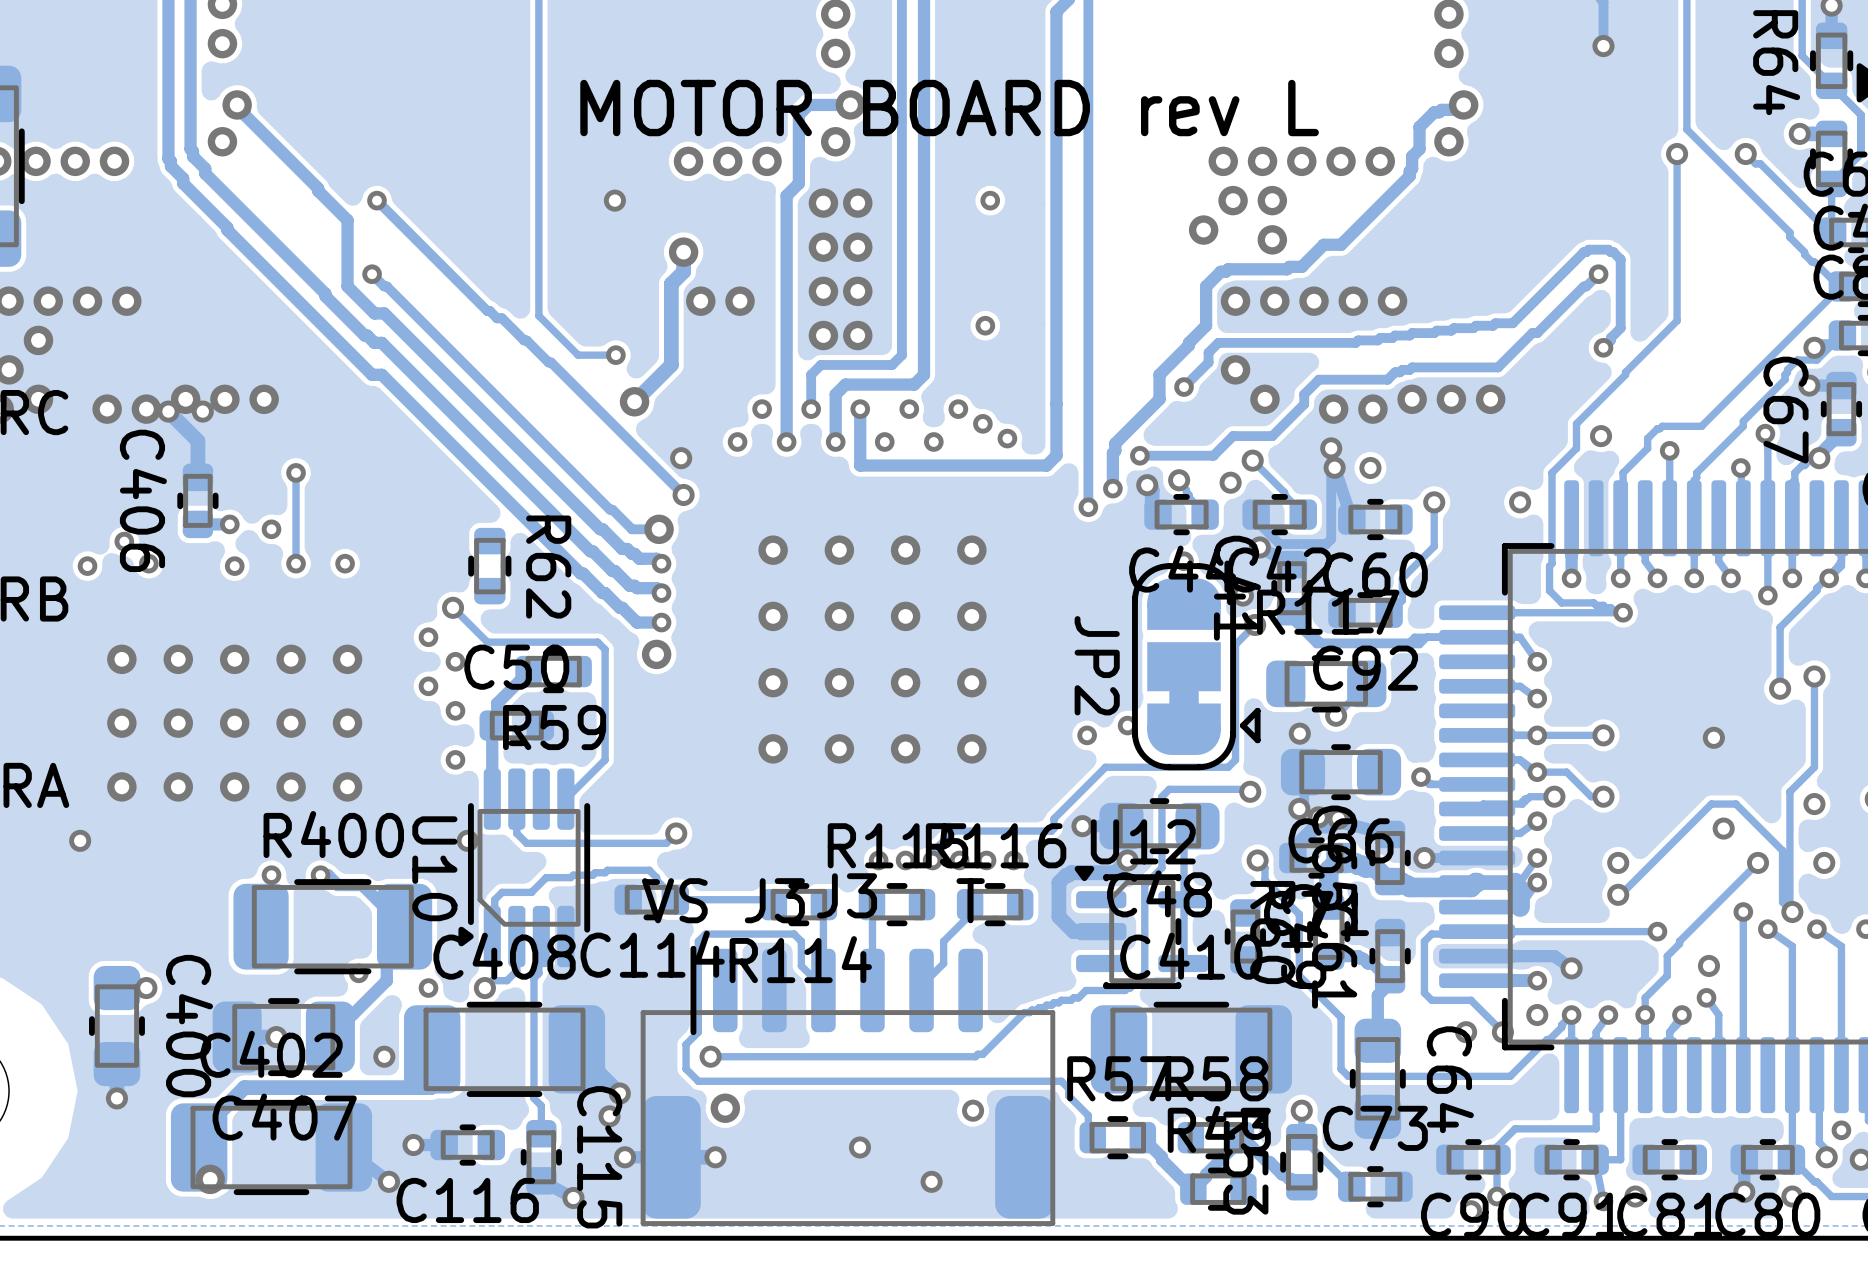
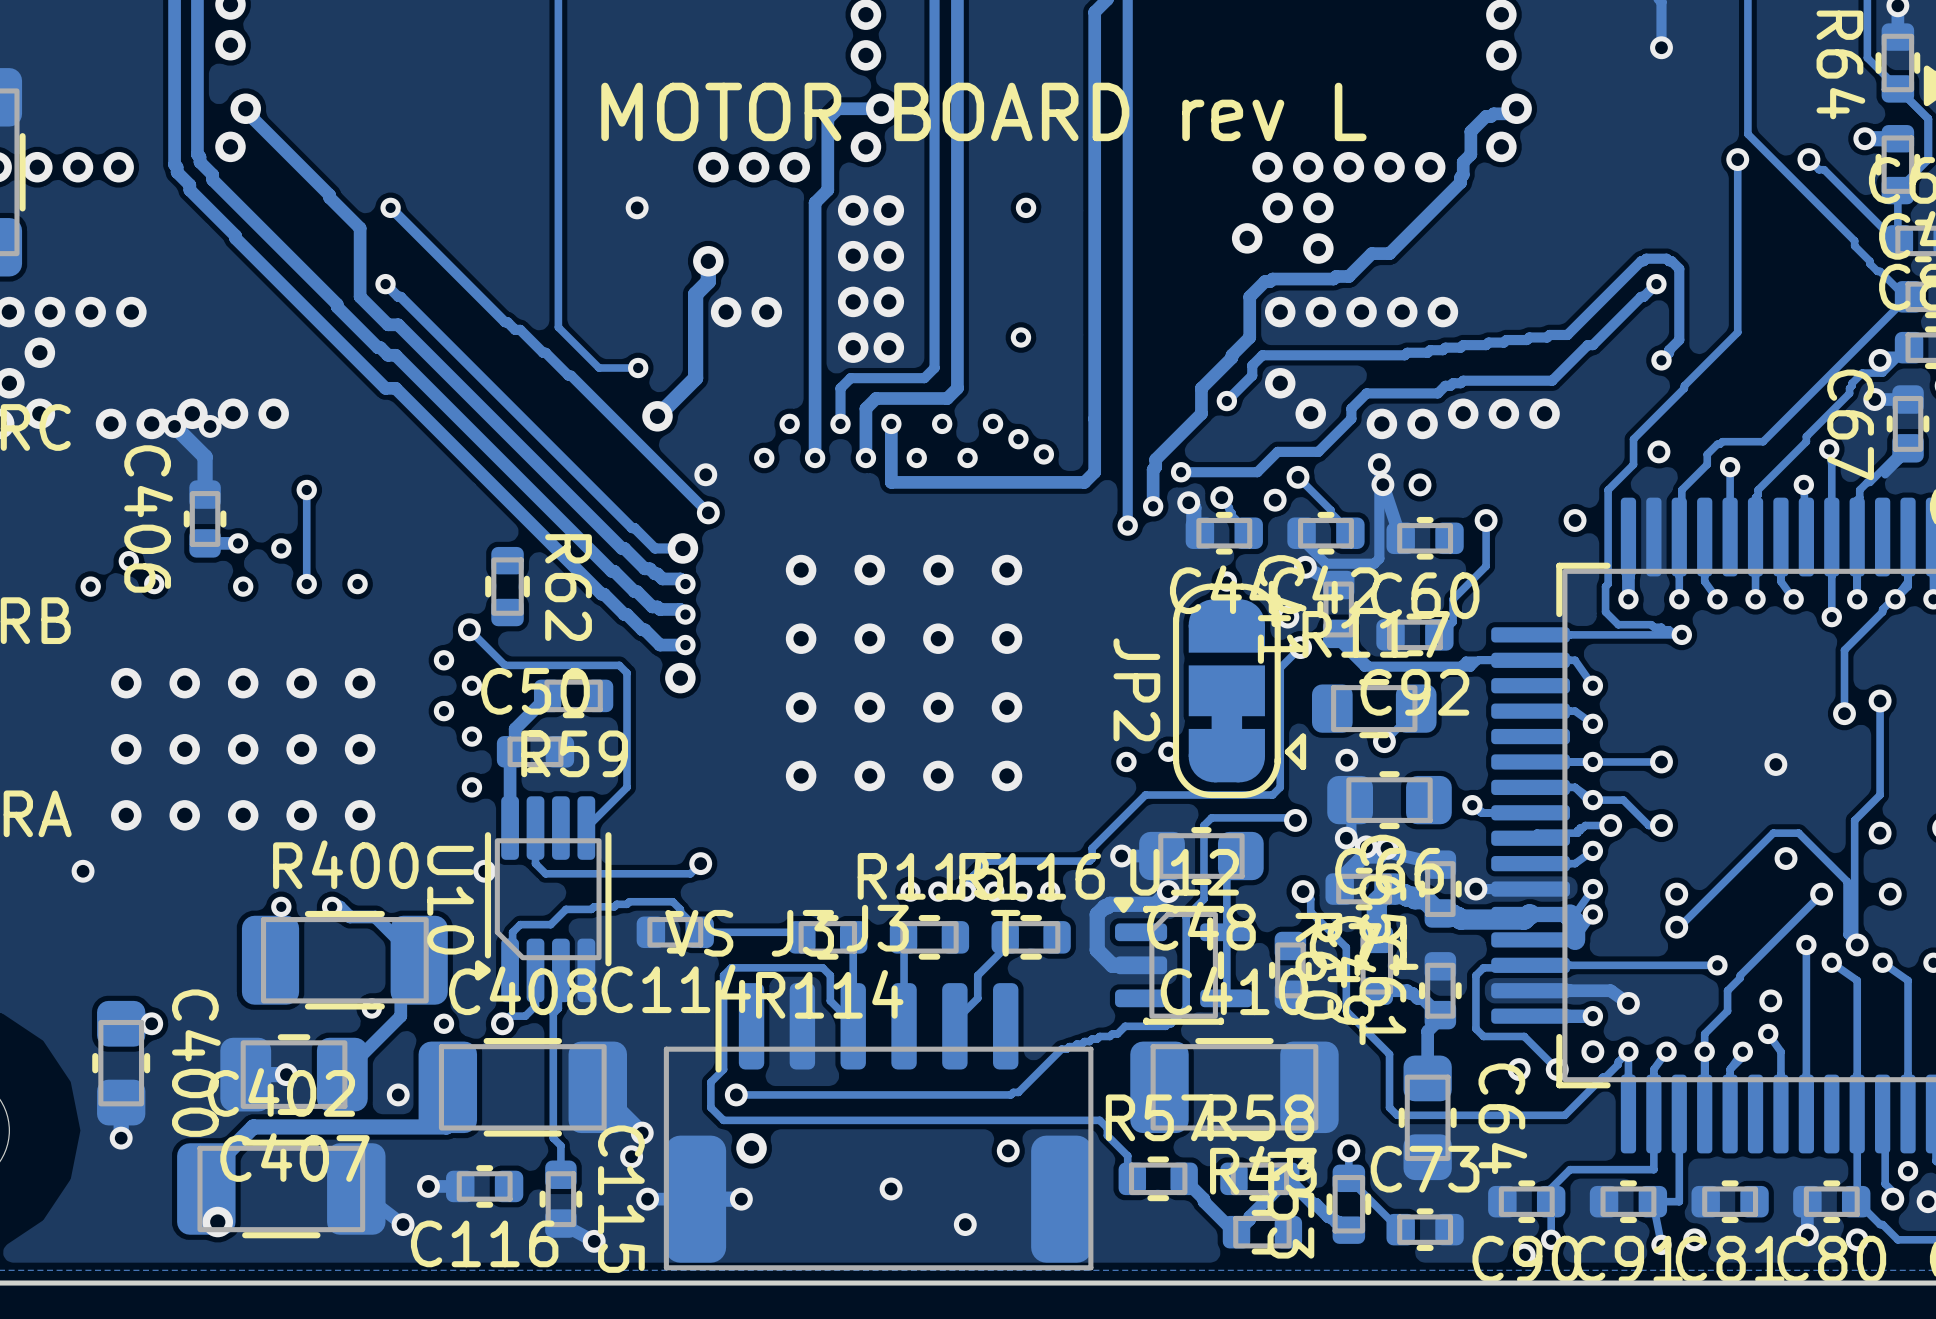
via: (1819, 458) -> none

